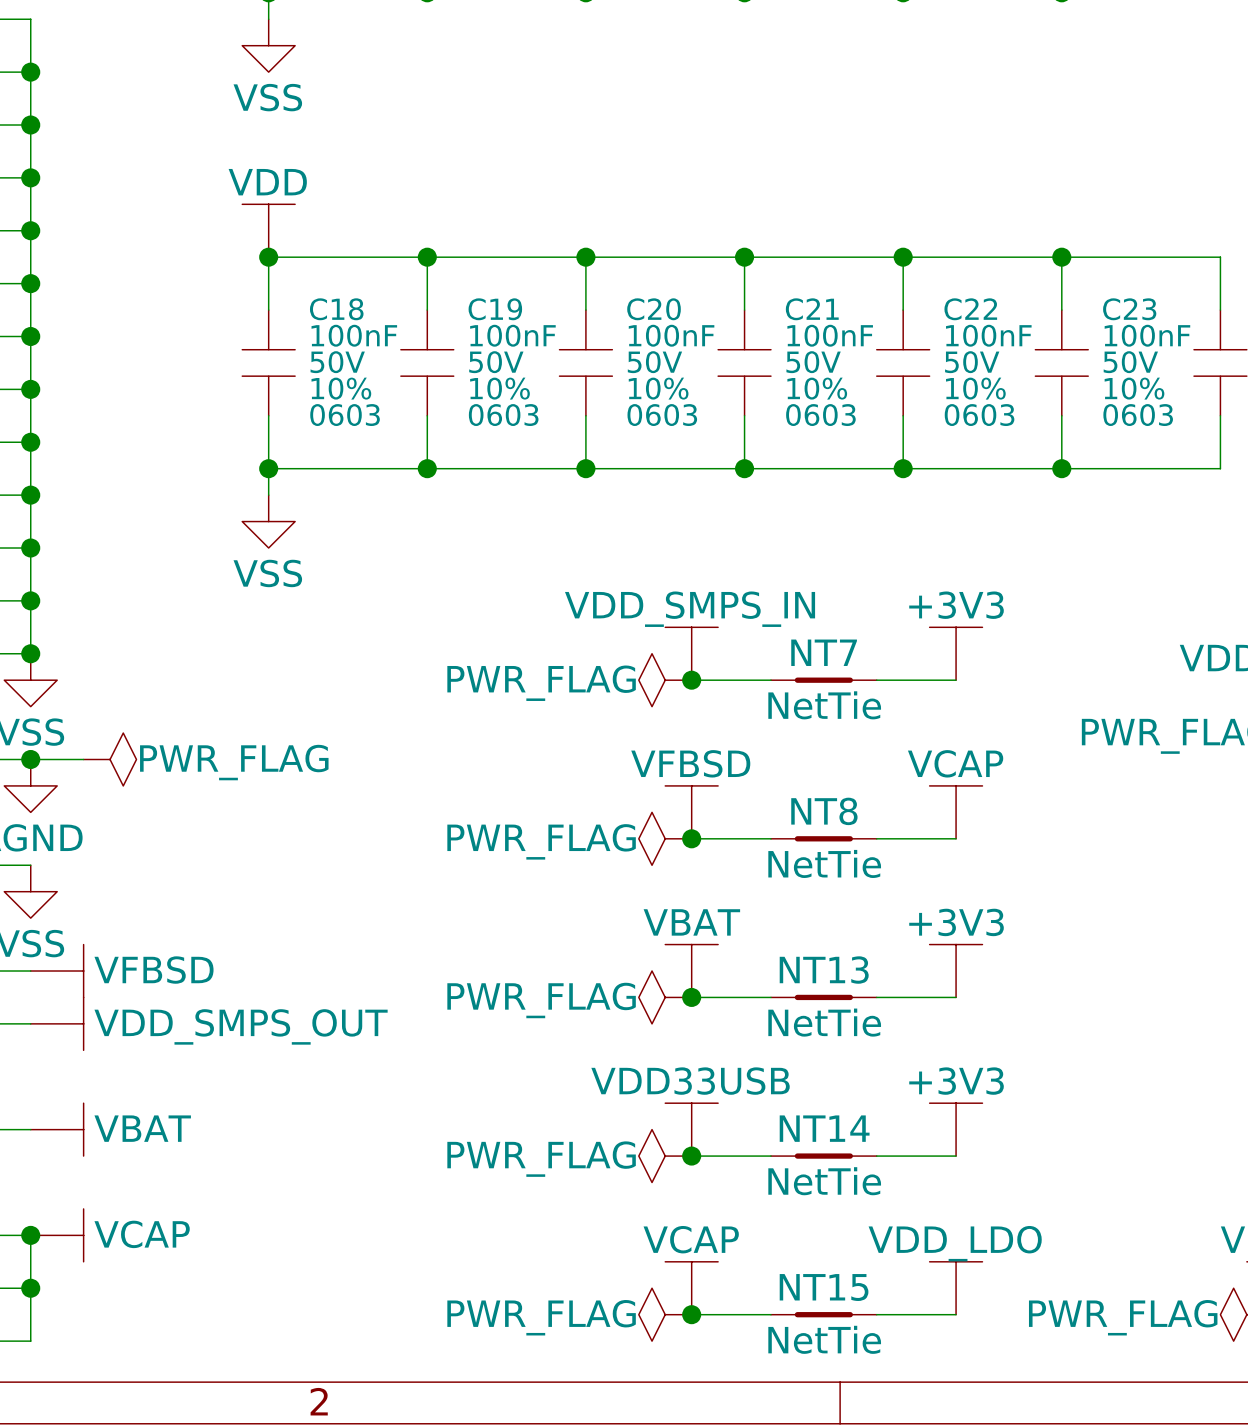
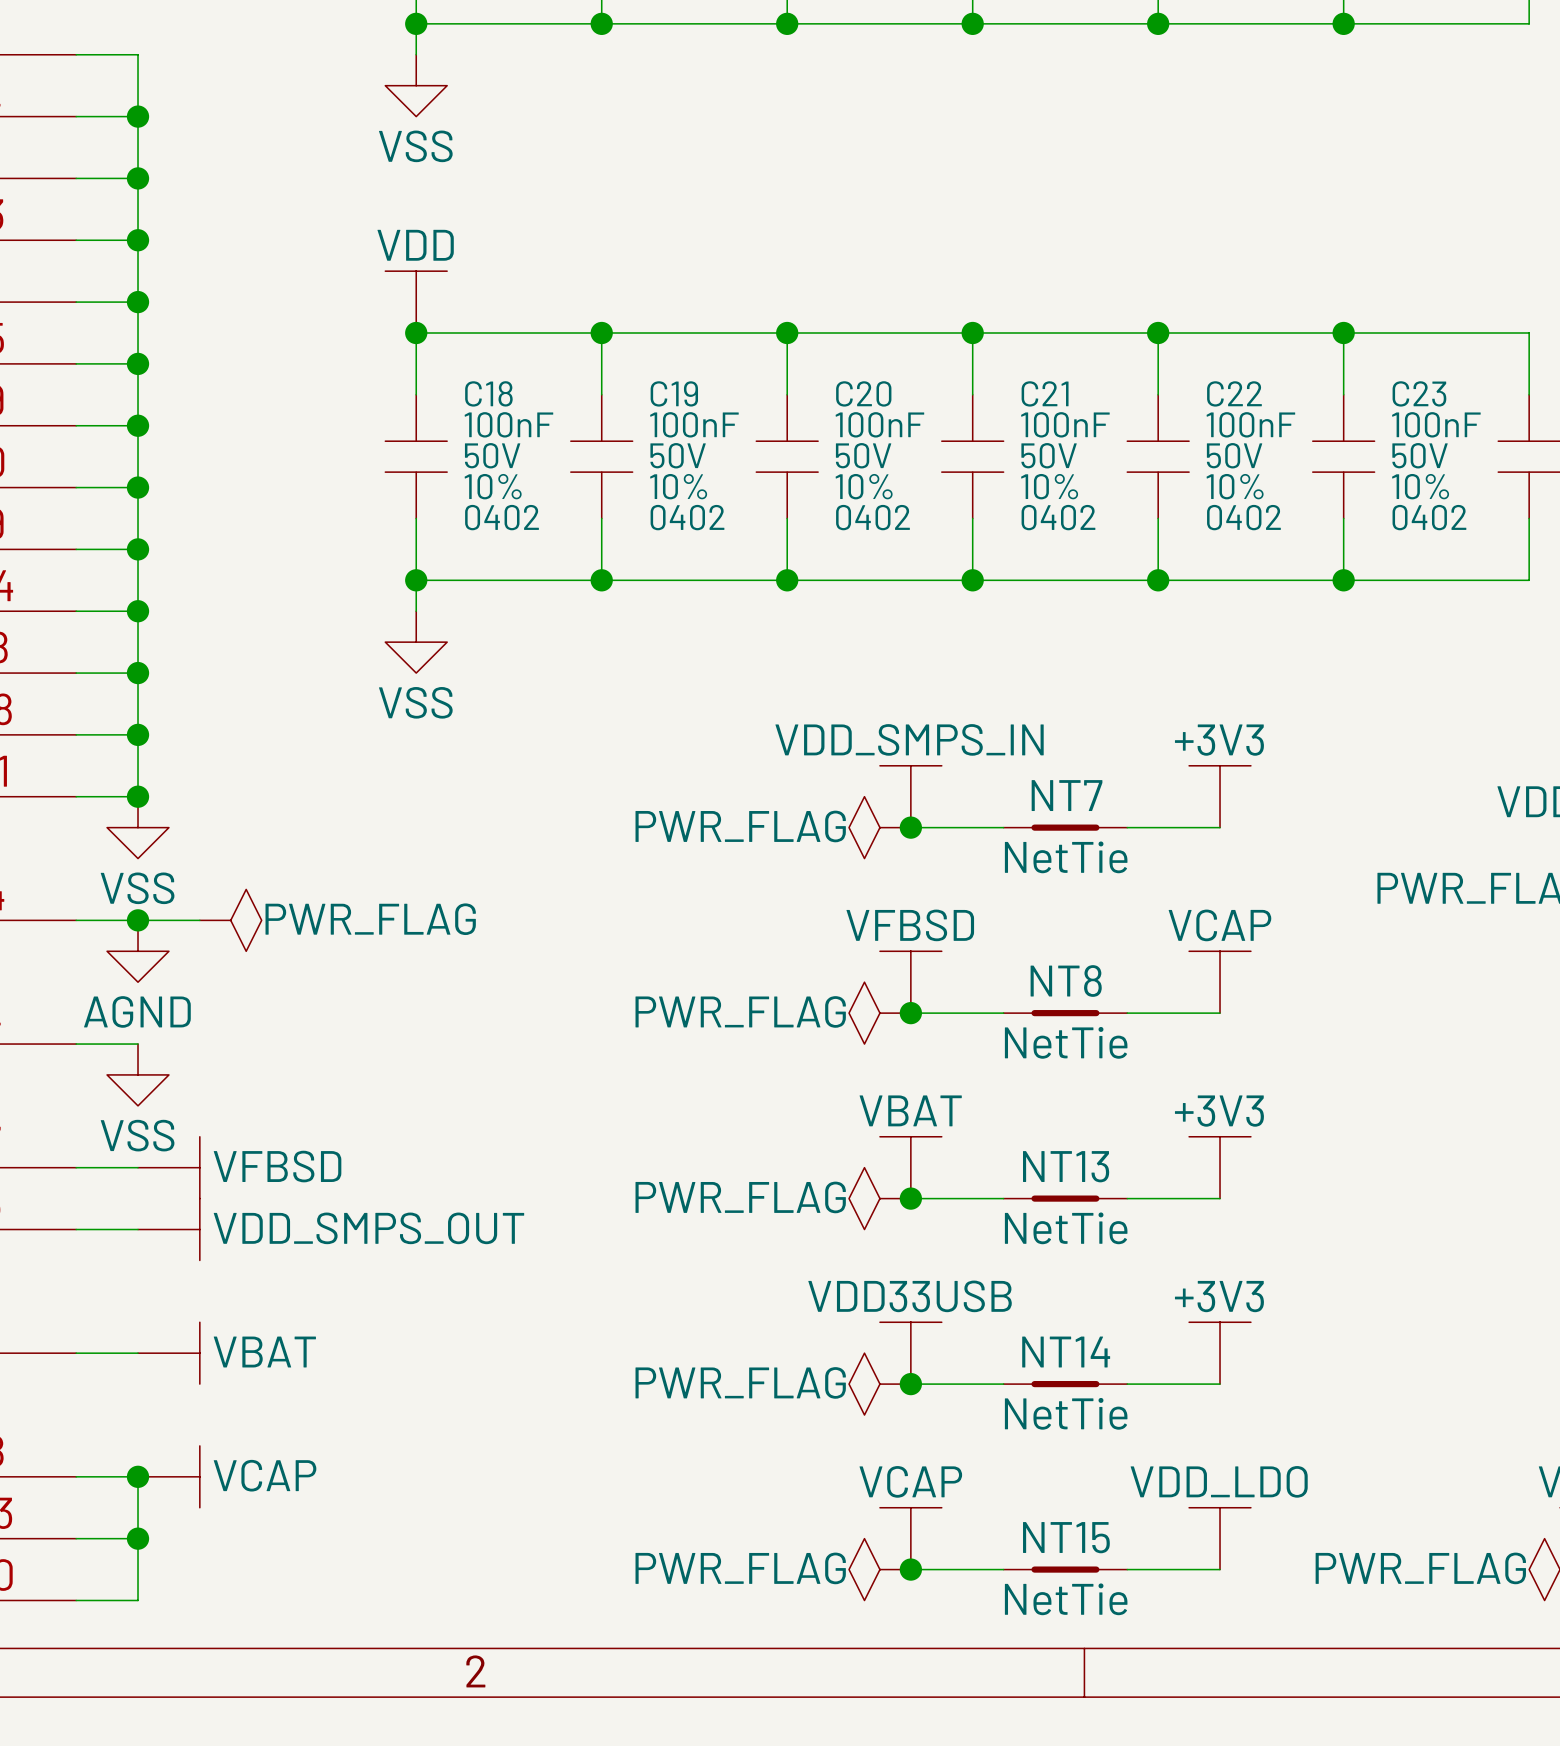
C18 text: 0603 (345, 415) -> 0402 (502, 517)
C19 text: 0603 (503, 415) -> 0402 (687, 517)
C20 text: 0603 (662, 415) -> 0402 (872, 517)
C21 text: 0603 (820, 415) -> 0402 (1058, 517)
C22 text: 0603 (979, 415) -> 0402 (1243, 517)
C23 text: 0603 (1138, 415) -> 0402 (1429, 517)

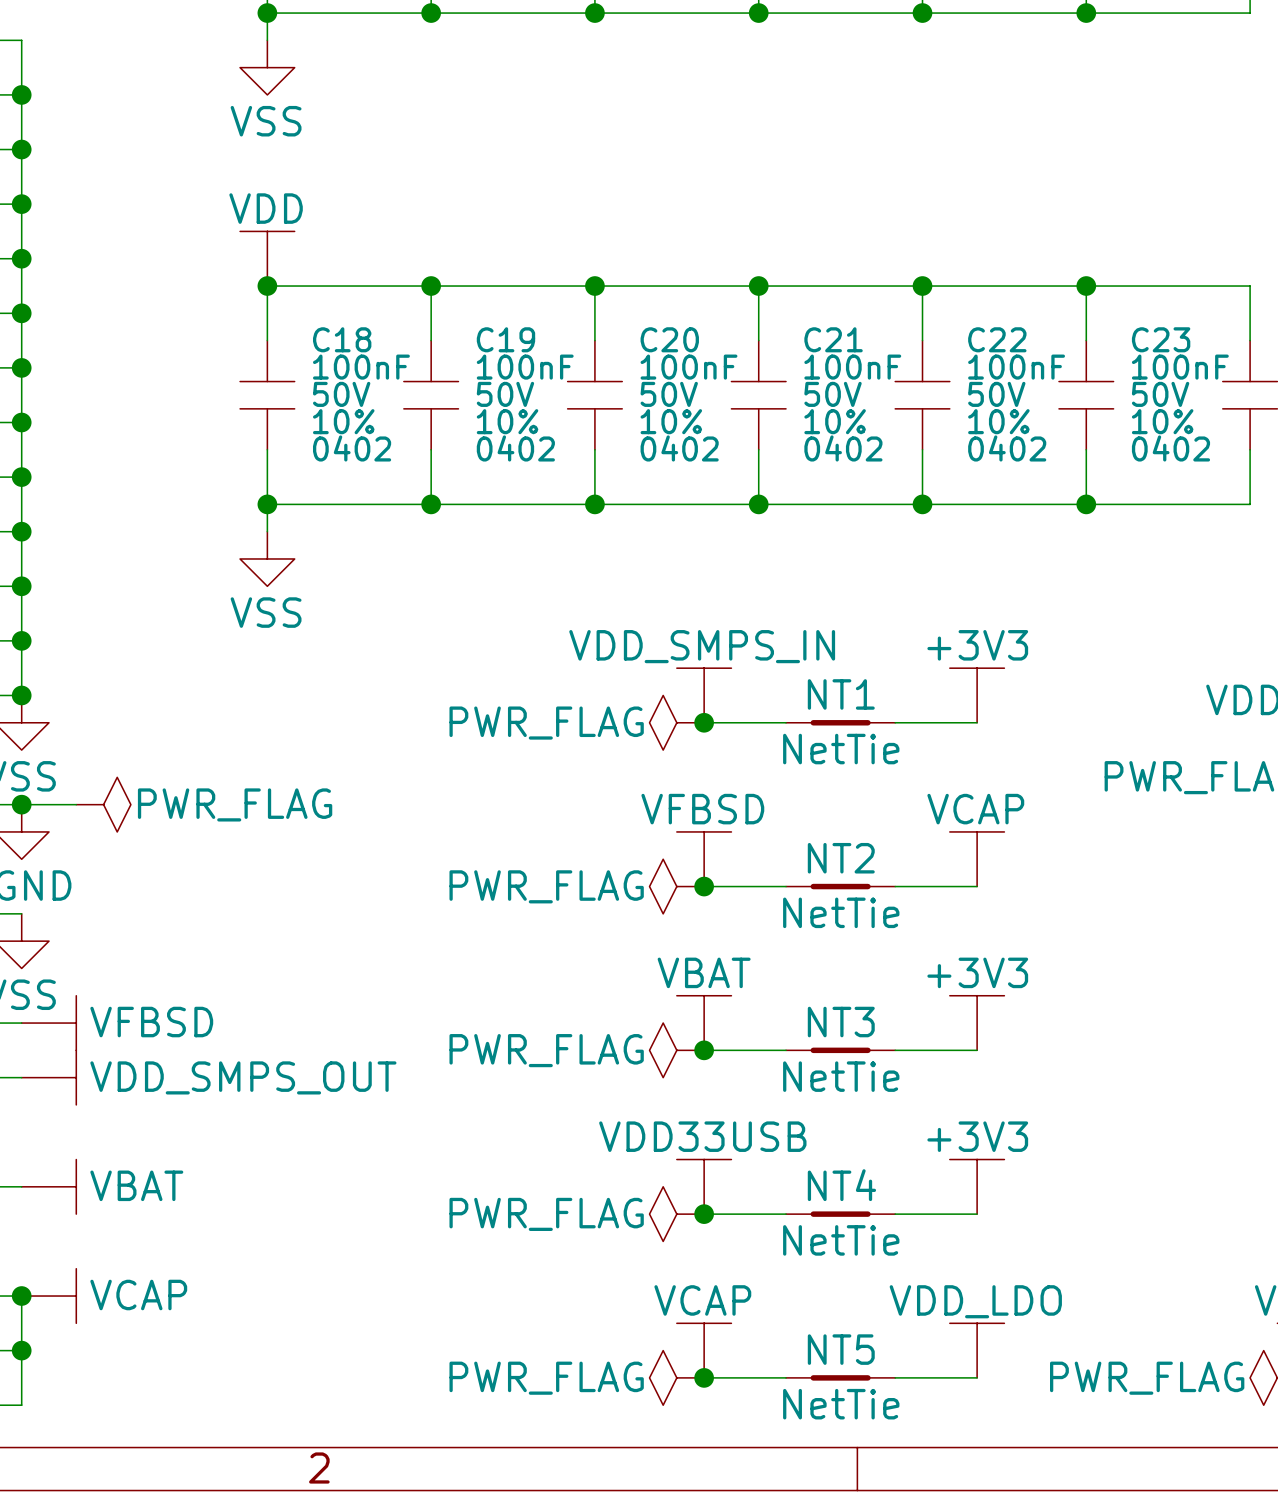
NT7 name: NT7 (1067, 795) -> NT1 (841, 694)
NT8 name: NT8 (1066, 981) -> NT2 (841, 858)
NT13 name: NT13 (1066, 1166) -> NT3 (841, 1022)
NT14 name: NT14 (1066, 1352) -> NT4 (841, 1185)
NT15 name: NT15 (1066, 1537) -> NT5 (841, 1349)

